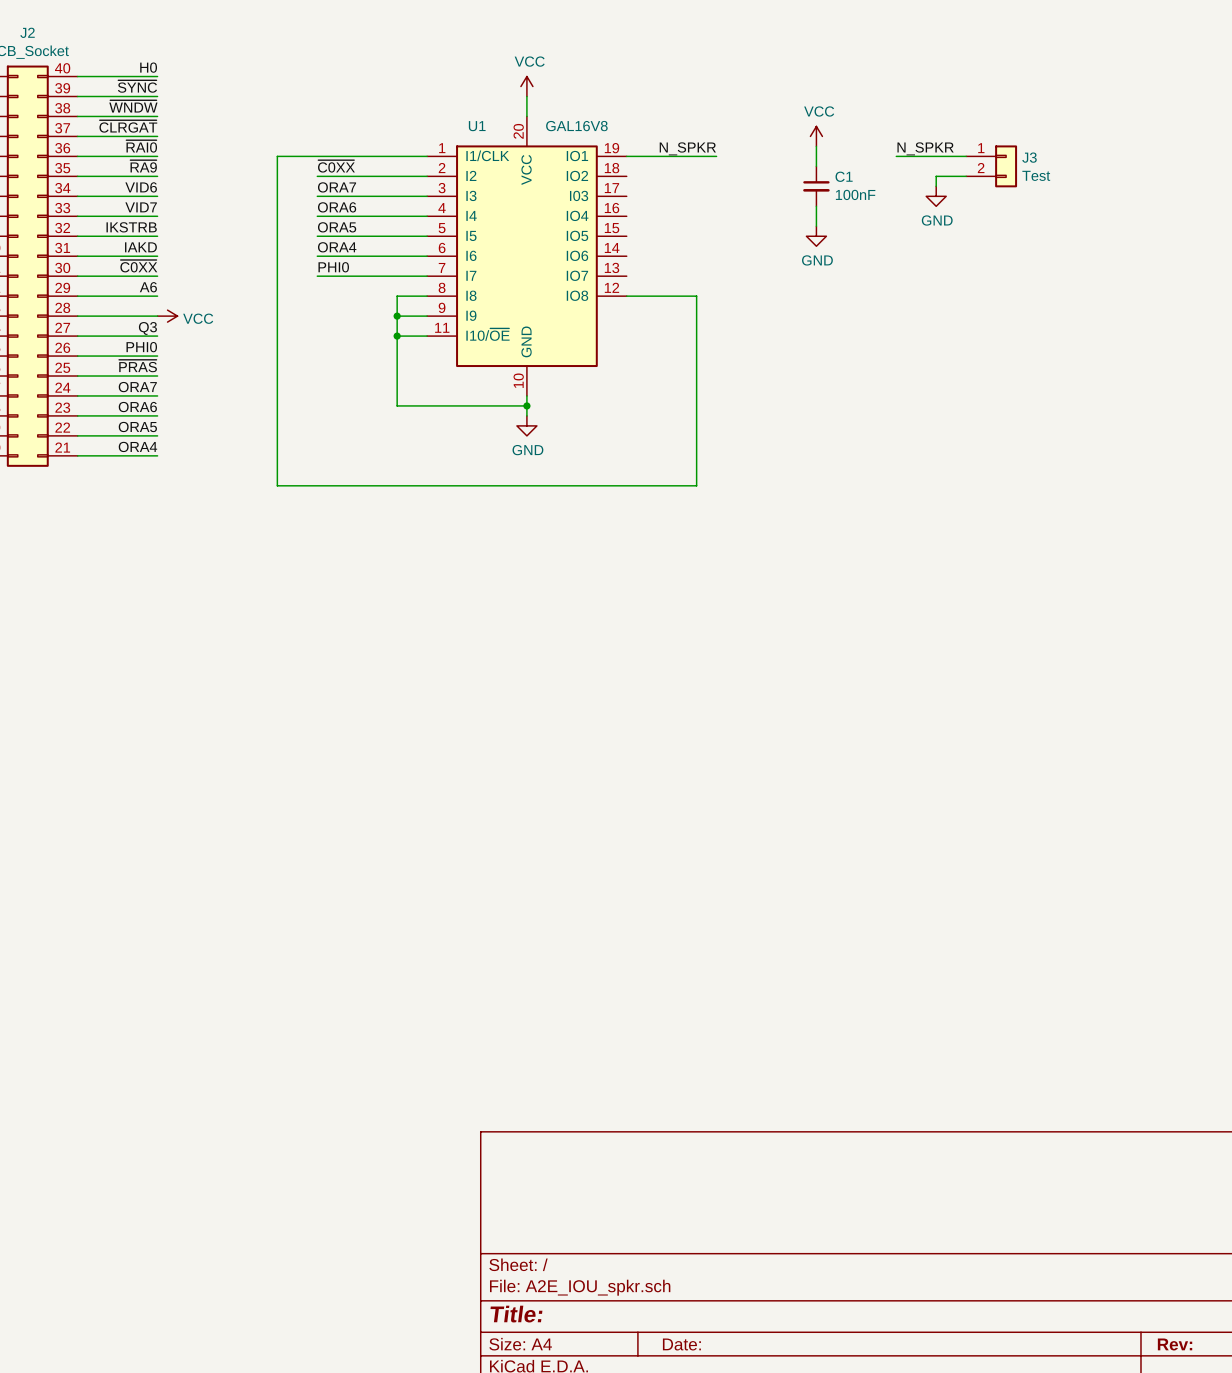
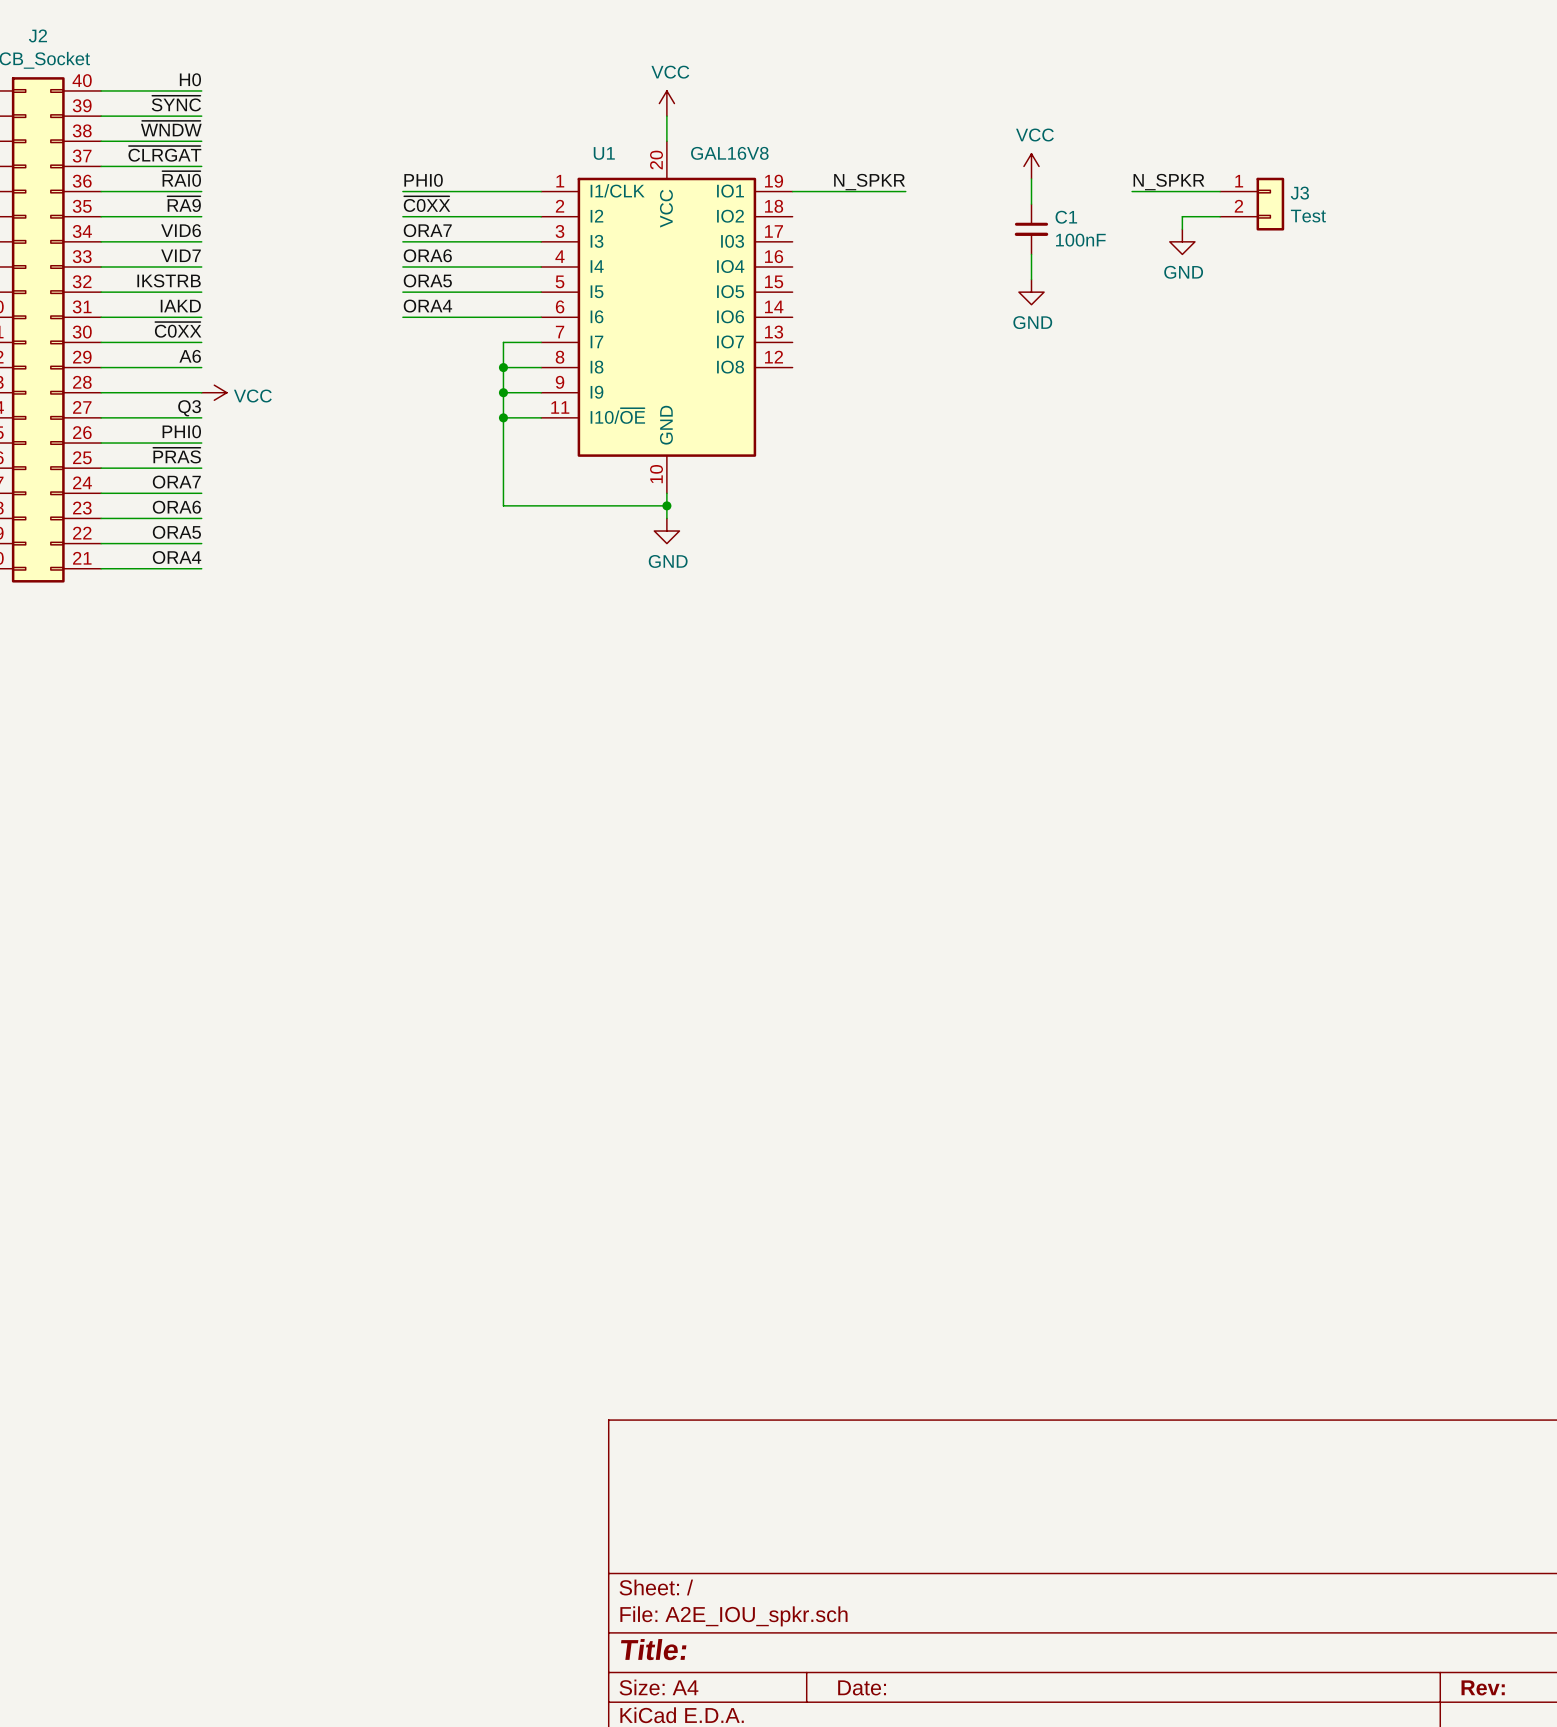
wire: (317, 156) (277, 156) (277, 485) (696, 485) (696, 296) (626, 296) -> none
label position: PHI0 (333, 267) -> PHI0 (423, 180)
wire: (317, 276) (397, 276) -> (503, 367) (503, 342)
junction: none -> (503, 367)

